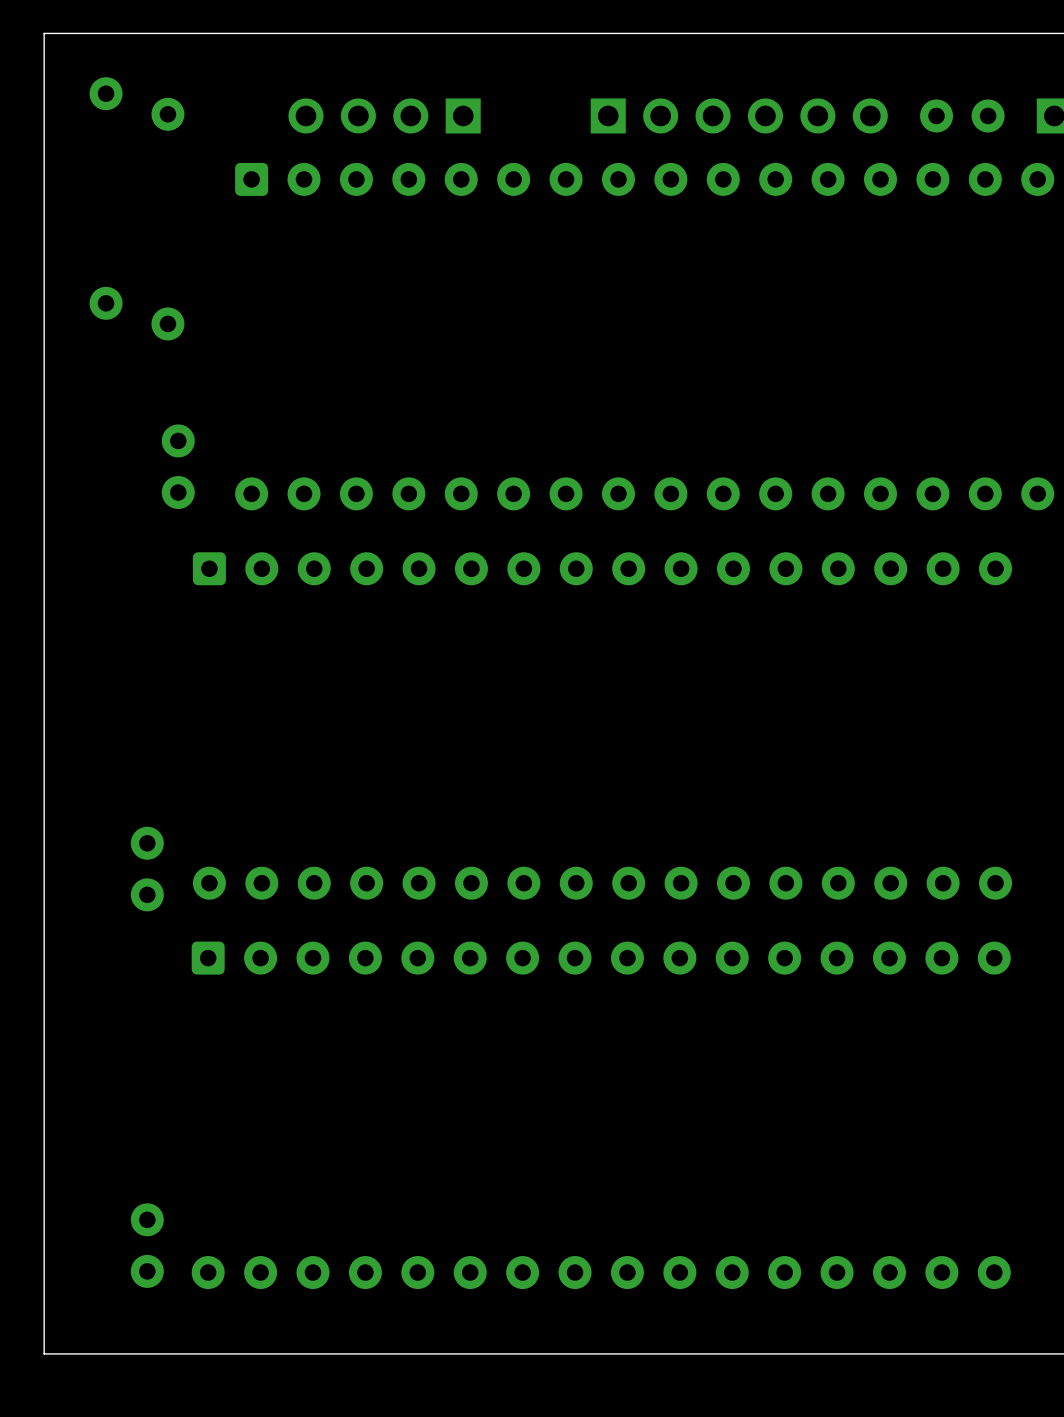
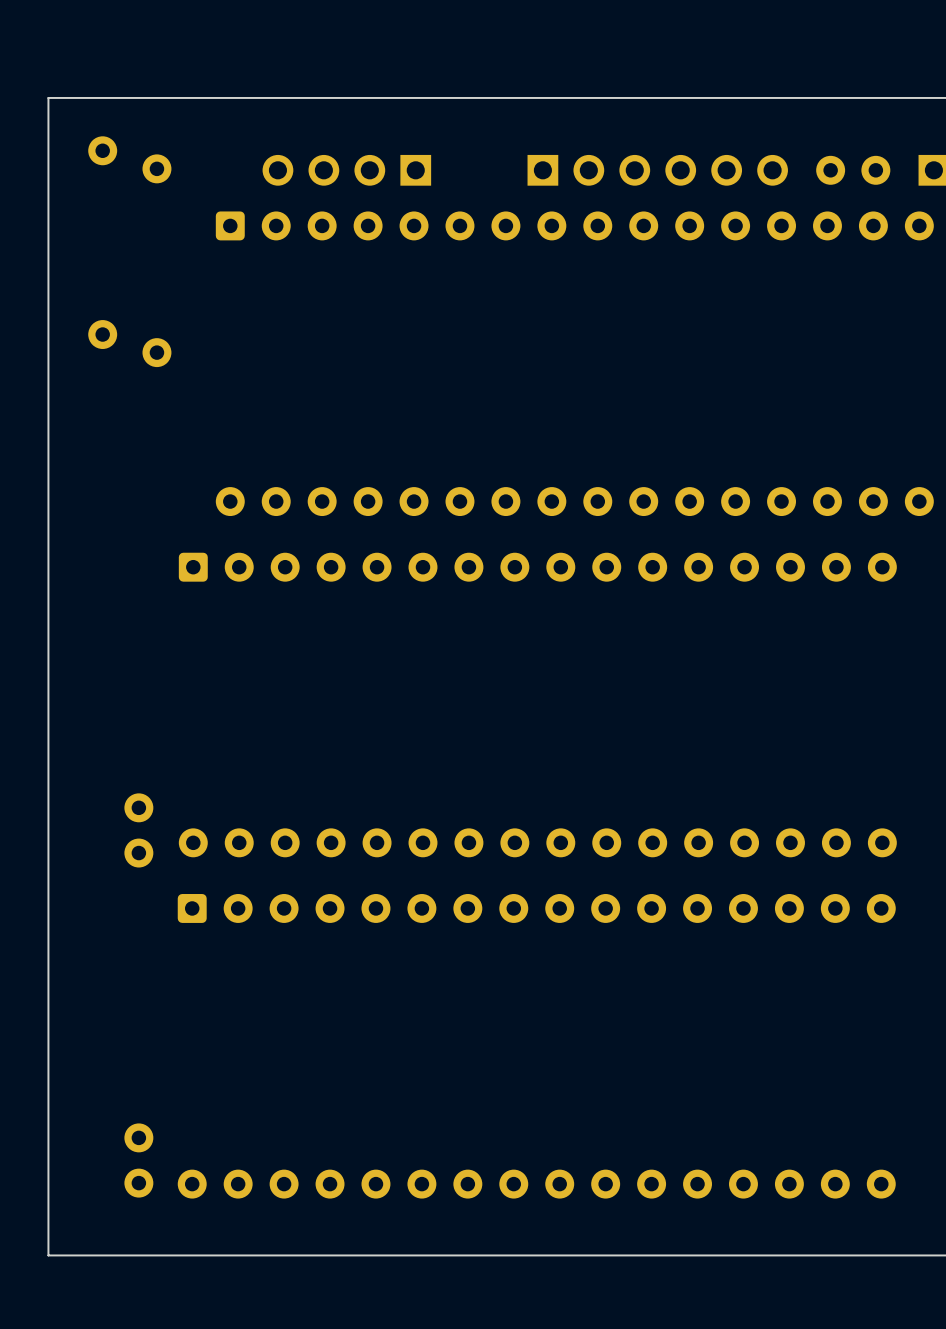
part: (178, 466) -> none

